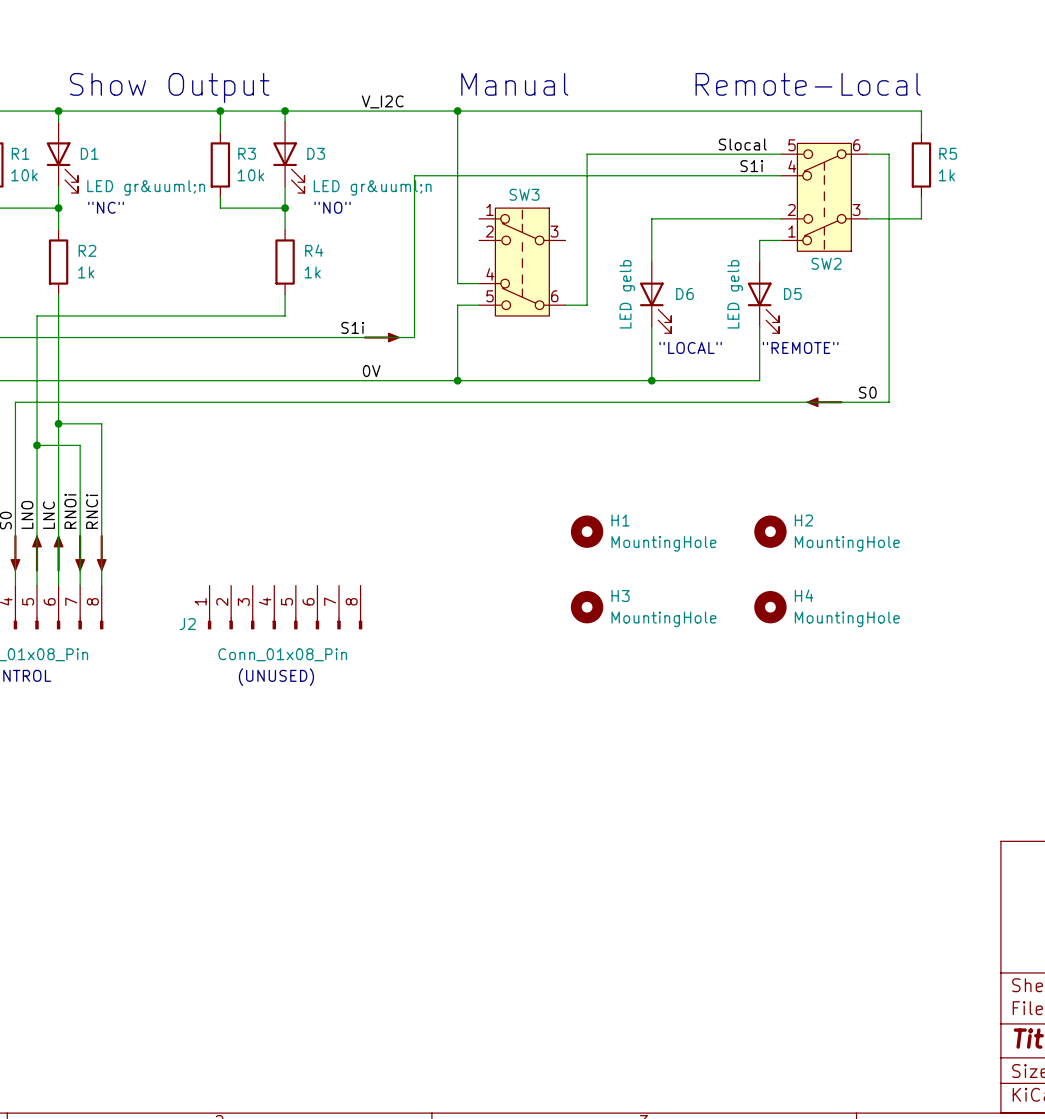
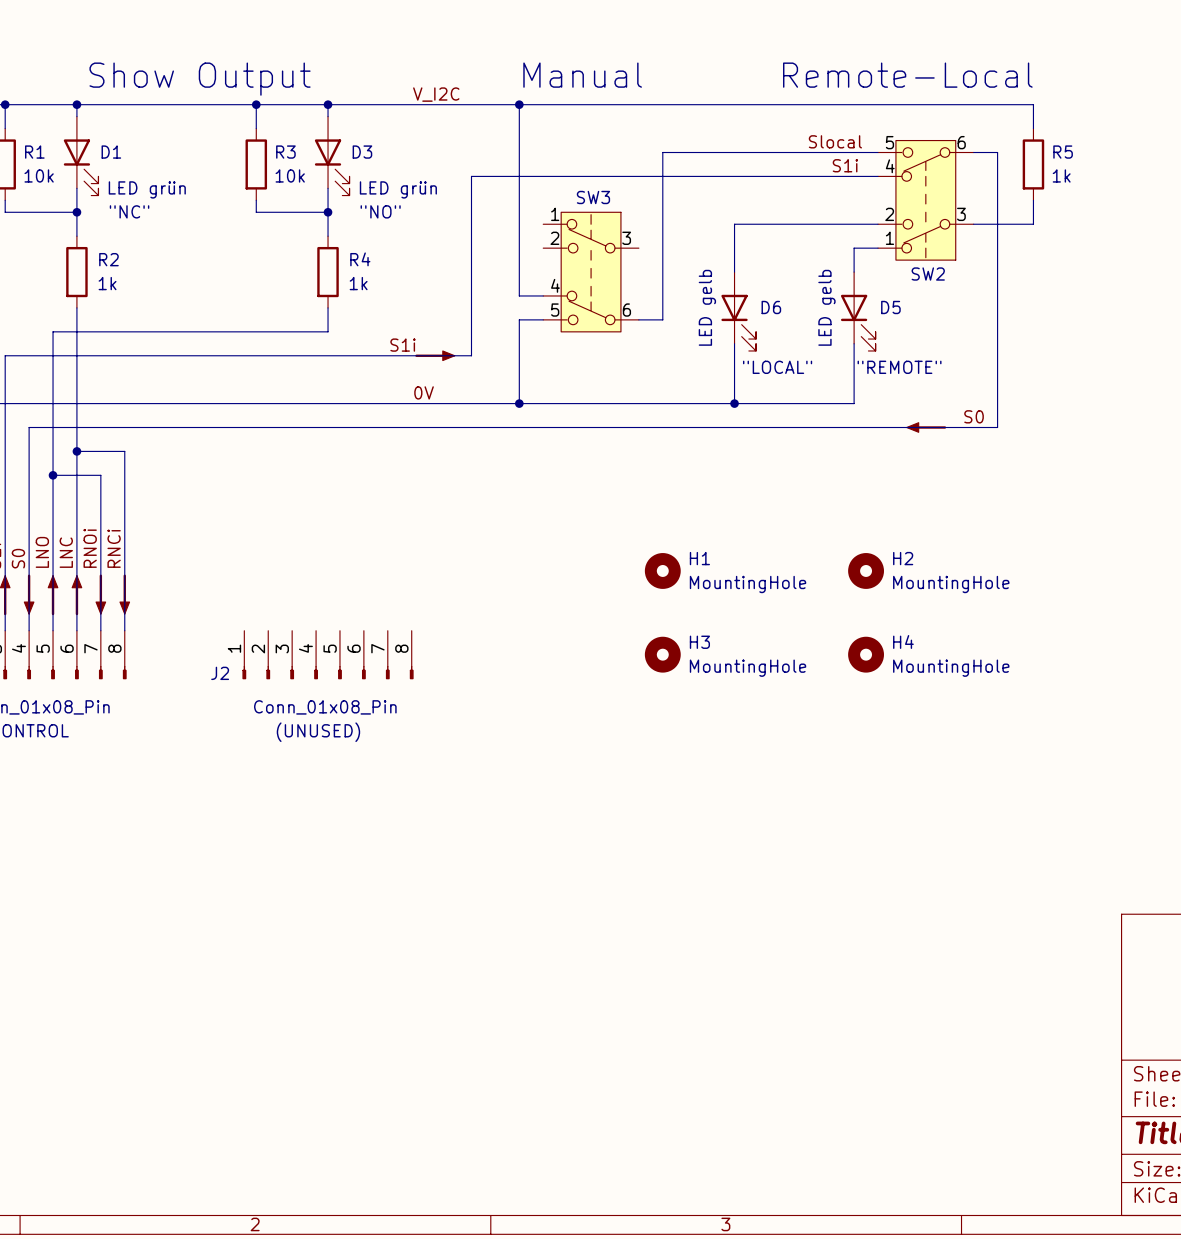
D1 value: LED gr&uuml;n (146, 187) -> LED grün (147, 189)
D3 value: LED gr&uuml;n (372, 187) -> LED grün (398, 189)

